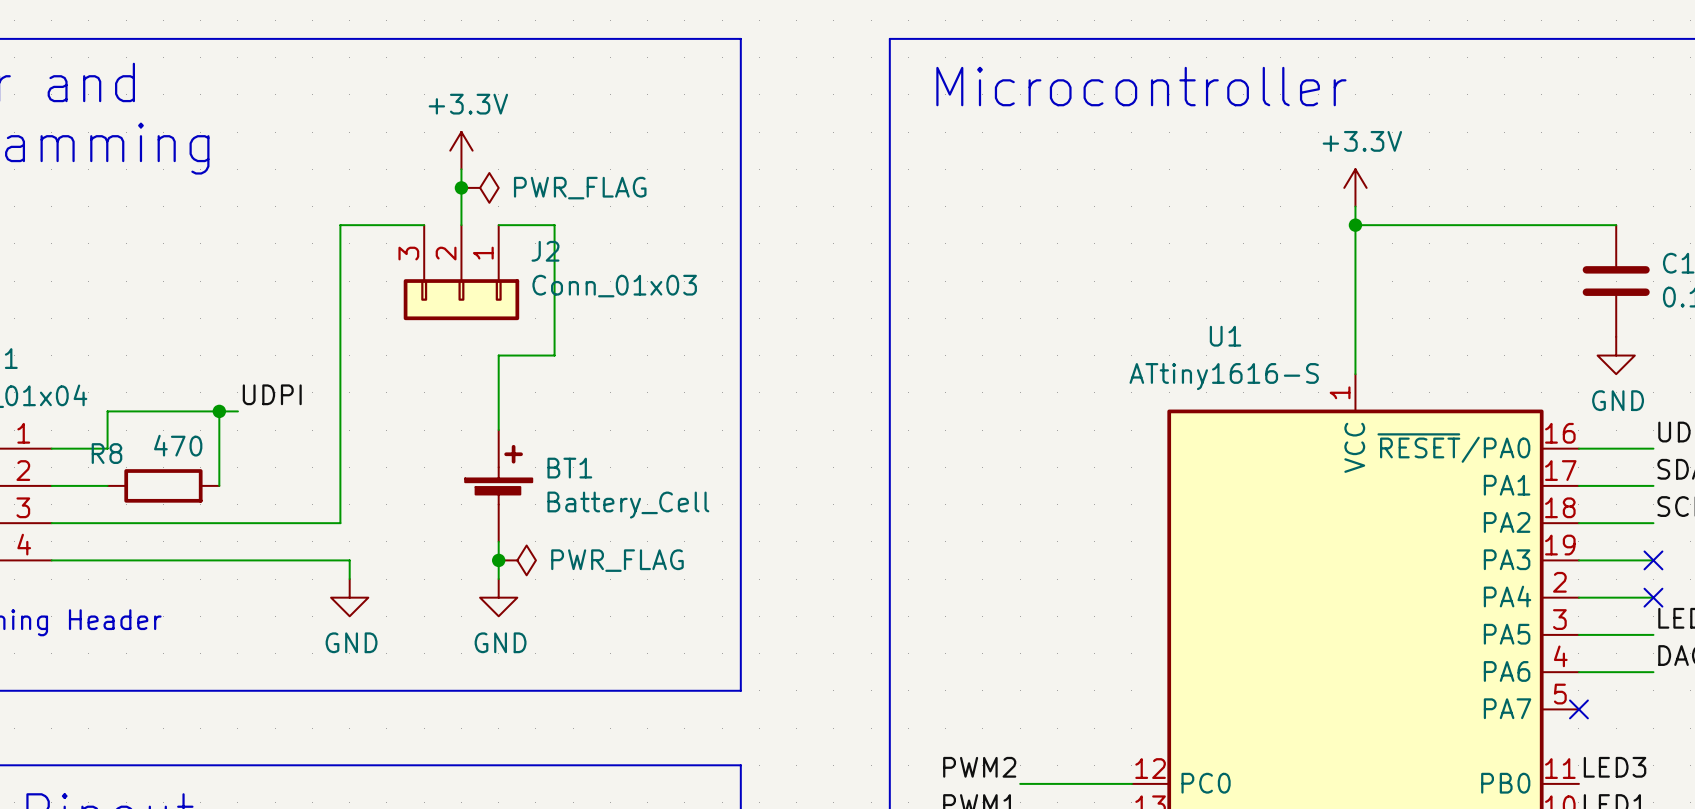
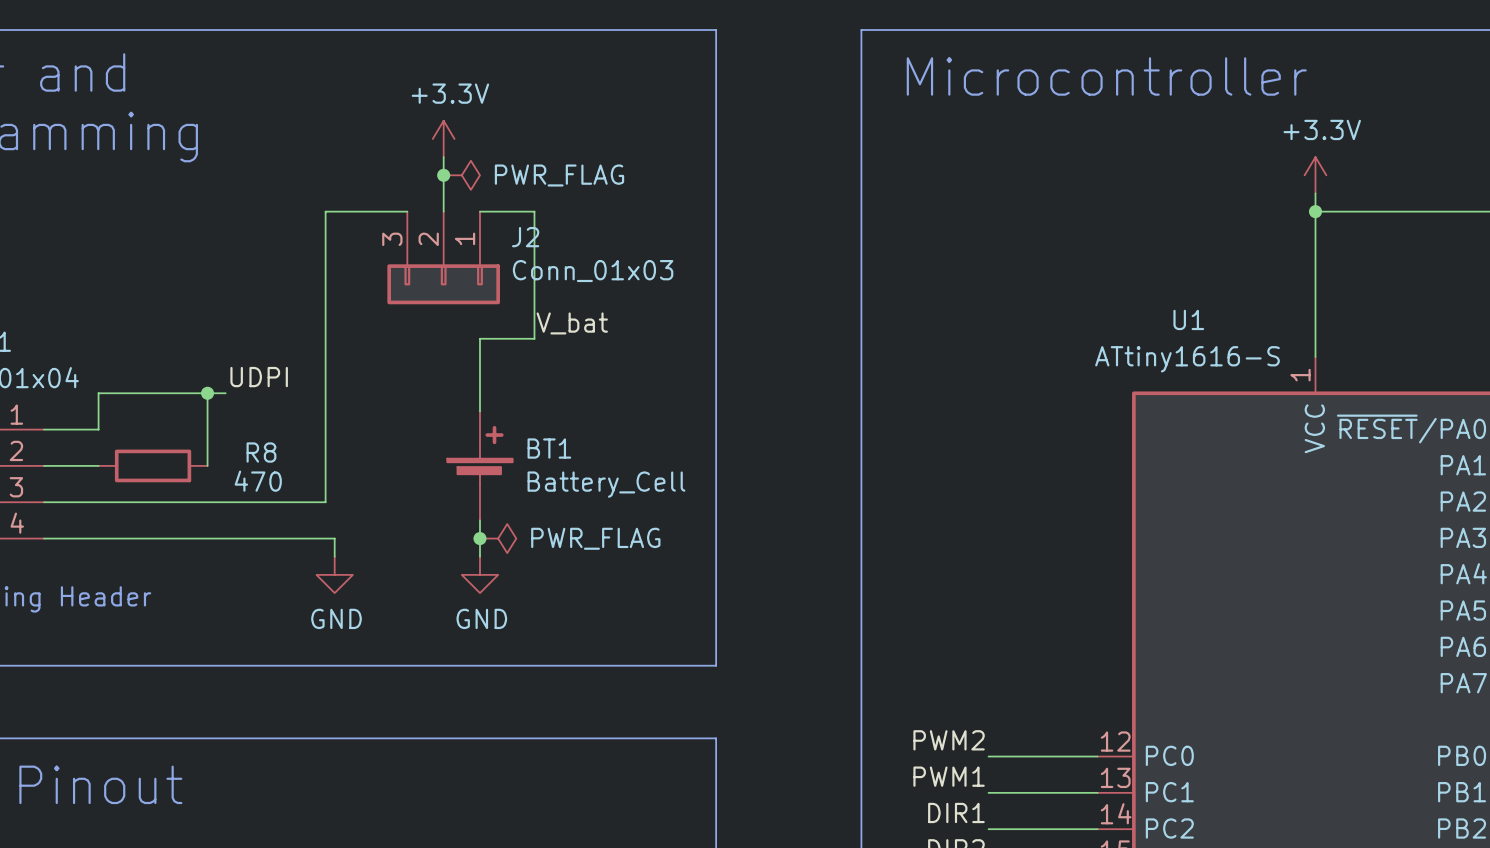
label: none -> V_bat (572, 323)
R8 value position: 470 (178, 445) -> 470 (258, 481)
R8 name position: R8 (106, 453) -> R8 (261, 452)

